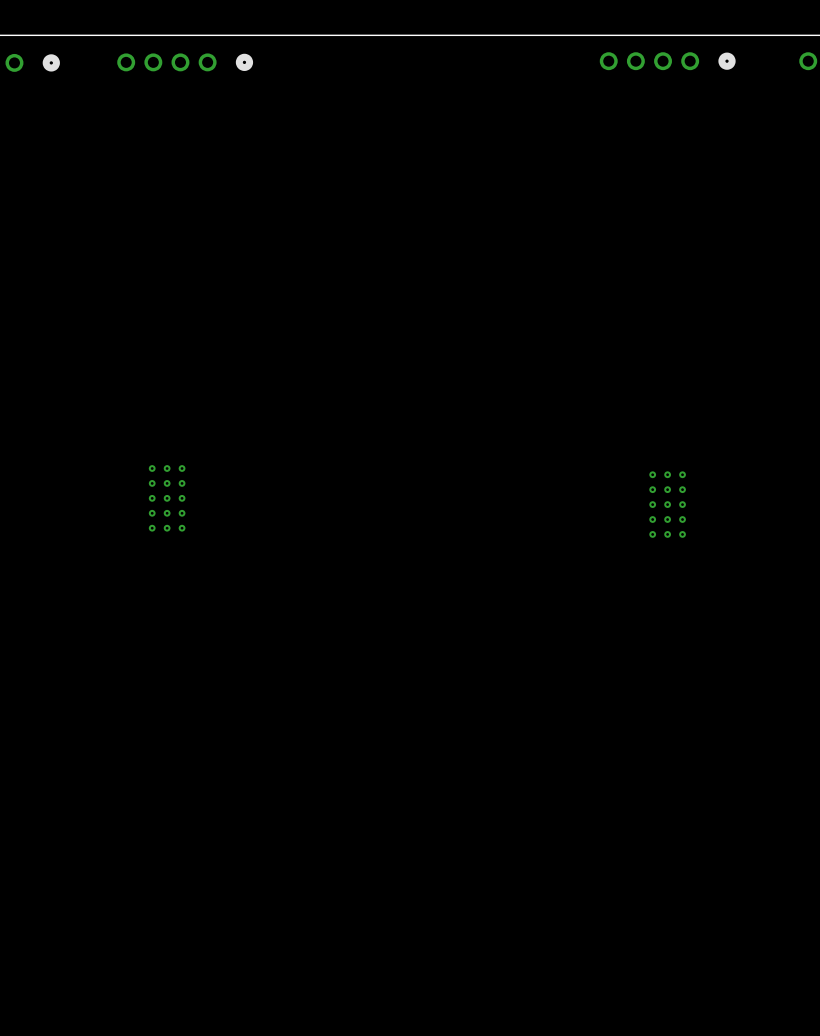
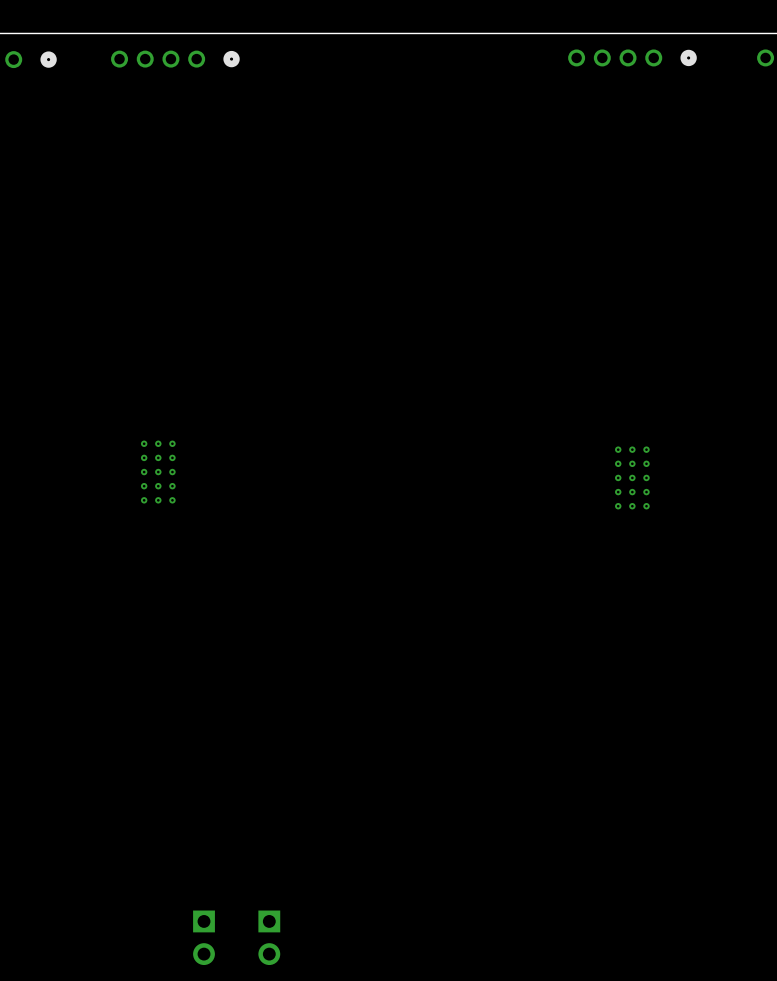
part: none -> (204, 937)
part: none -> (269, 937)

